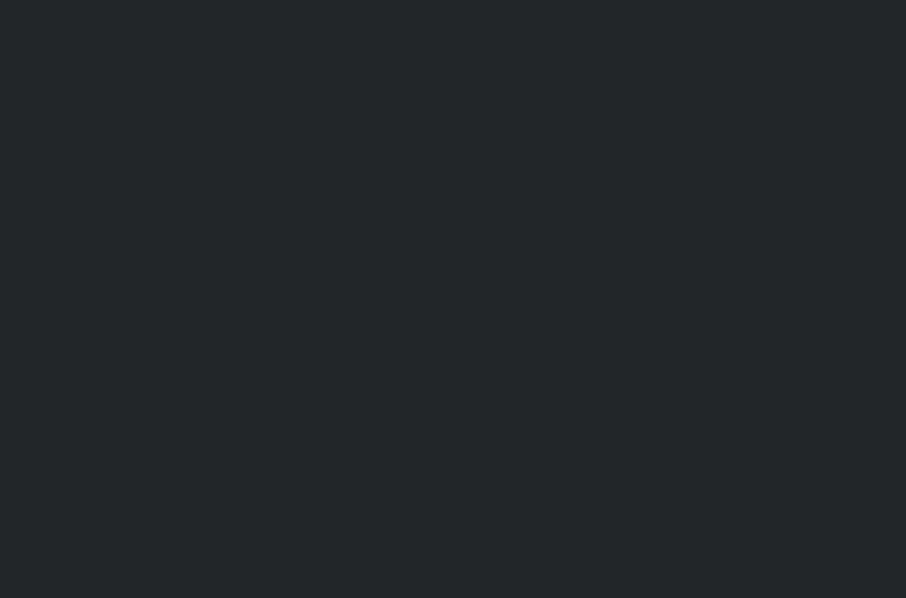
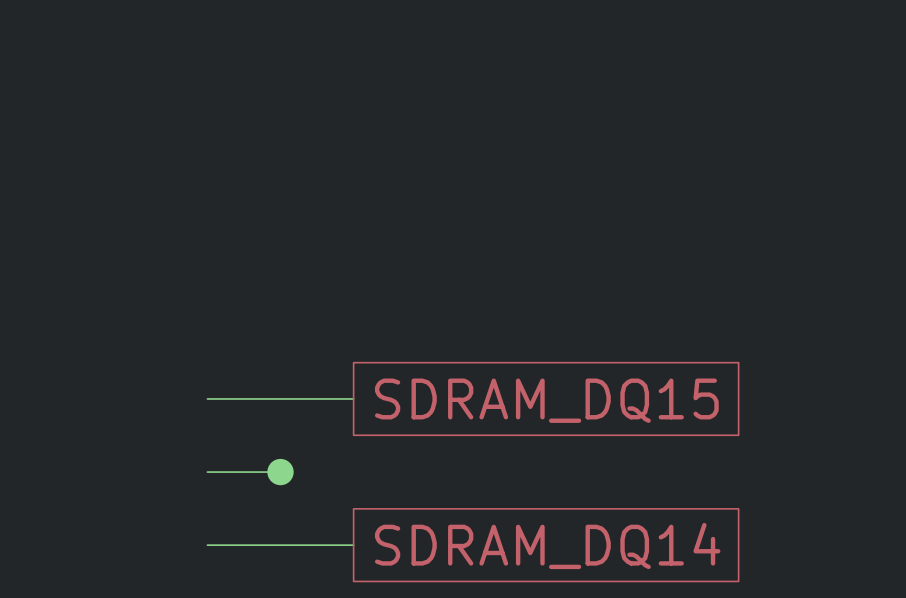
wire: none -> (207, 398) (353, 398)
global label: none -> SDRAM_DQ15 (546, 400)
wire: none -> (207, 472) (280, 472)
junction: none -> (280, 472)
wire: none -> (207, 545) (353, 545)
global label: none -> SDRAM_DQ14 (547, 546)

